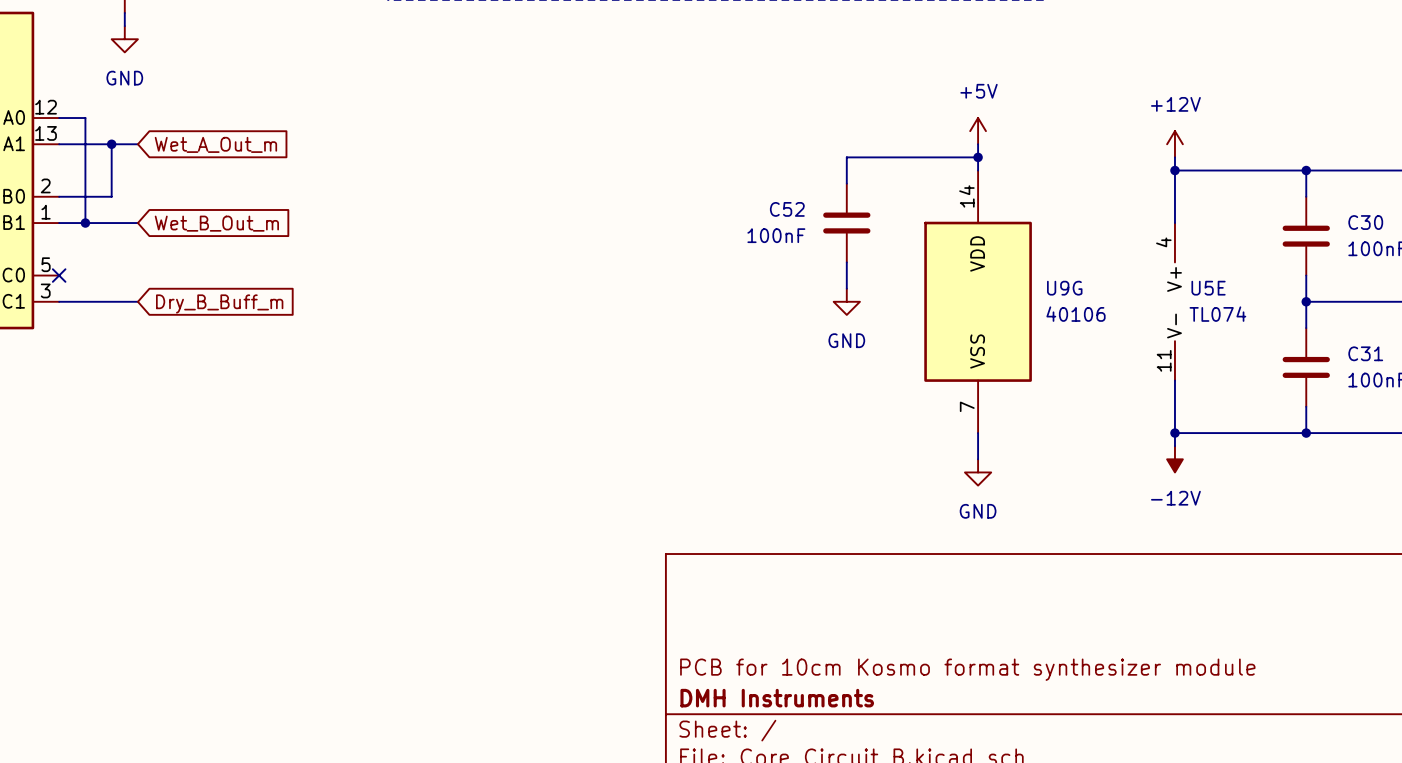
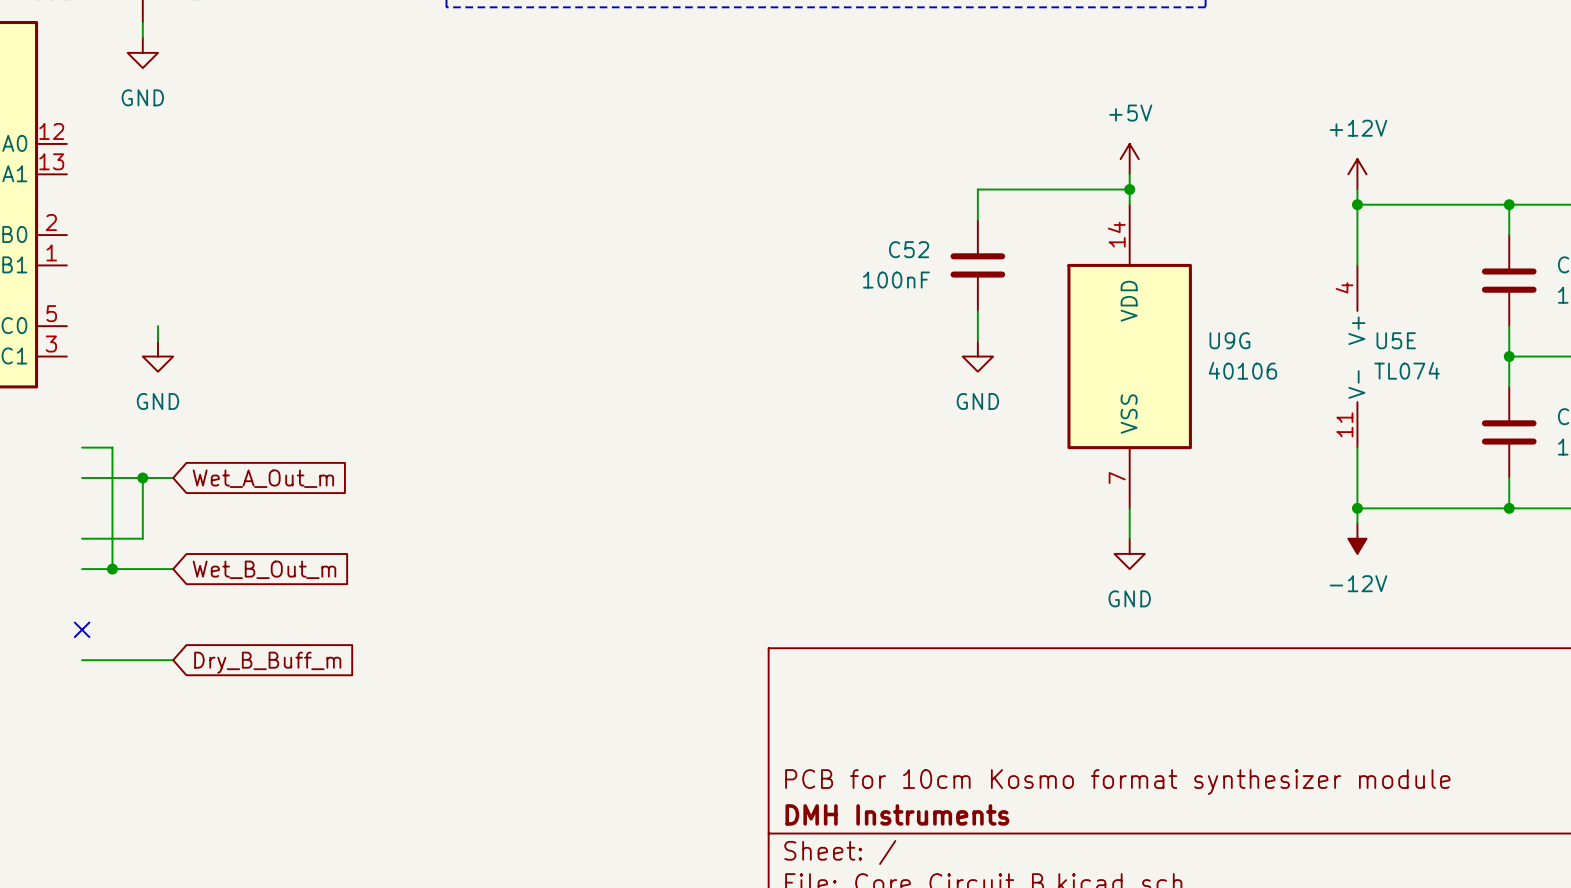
wire: (59, 118) (85, 118) (85, 223) -> none
wire: (59, 144) (137, 144) -> none
wire: (111, 144) (111, 196) (59, 196) -> none
junction: (111, 144) -> none
global label: Wet_A_Out_m (215, 144) -> none
wire: (59, 223) (137, 223) -> (82, 477) (173, 477)
junction: (85, 223) -> none
global label: Wet_B_Out_m (216, 223) -> none
no-connect mark: (59, 275) -> none
wire: none -> (157, 326) (157, 341)
wire: (59, 301) (137, 301) -> (82, 569) (173, 569)
power symbol: none -> GND (157, 356)
global label: Dry_B_Buff_m (219, 303) -> none
wire: none -> (82, 447) (112, 447) (112, 569)
wire: none -> (142, 477) (142, 538) (82, 538)
junction: none -> (142, 477)
global label: none -> Wet_A_Out_m (263, 478)
junction: none -> (112, 569)
global label: none -> Wet_B_Out_m (264, 569)
no-connect mark: none -> (82, 629)
wire: none -> (82, 660) (173, 660)
global label: none -> Dry_B_Buff_m (267, 662)

